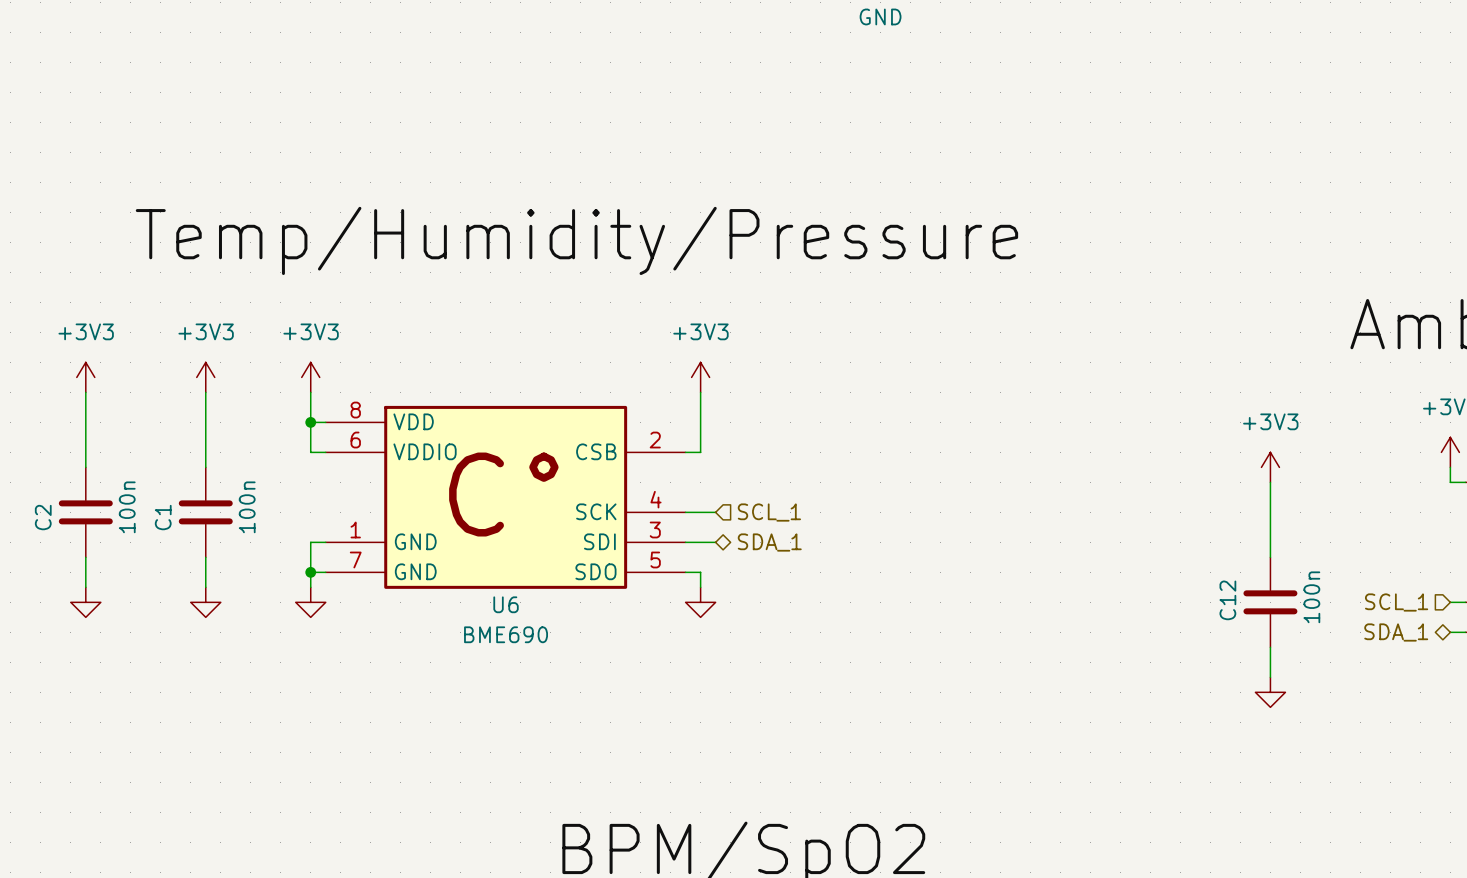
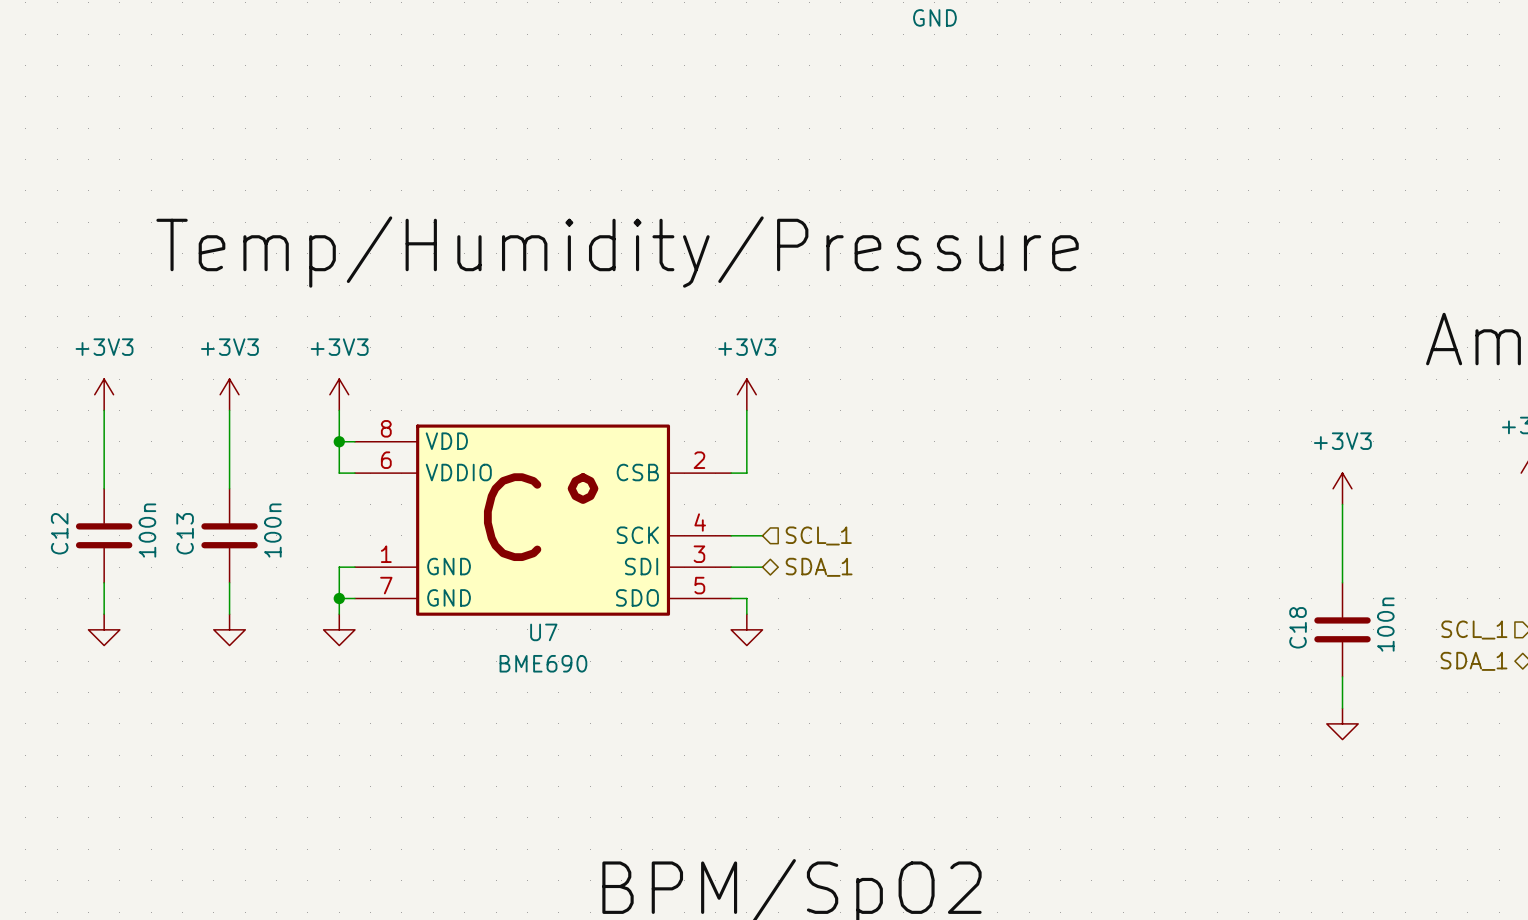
C2 name: C2 (43, 517) -> C12 (59, 533)
C1 name: C1 (163, 517) -> C13 (185, 533)
C12 name: C12 (1227, 600) -> C18 (1298, 627)
U6 name: U6 (506, 604) -> U7 (543, 632)

